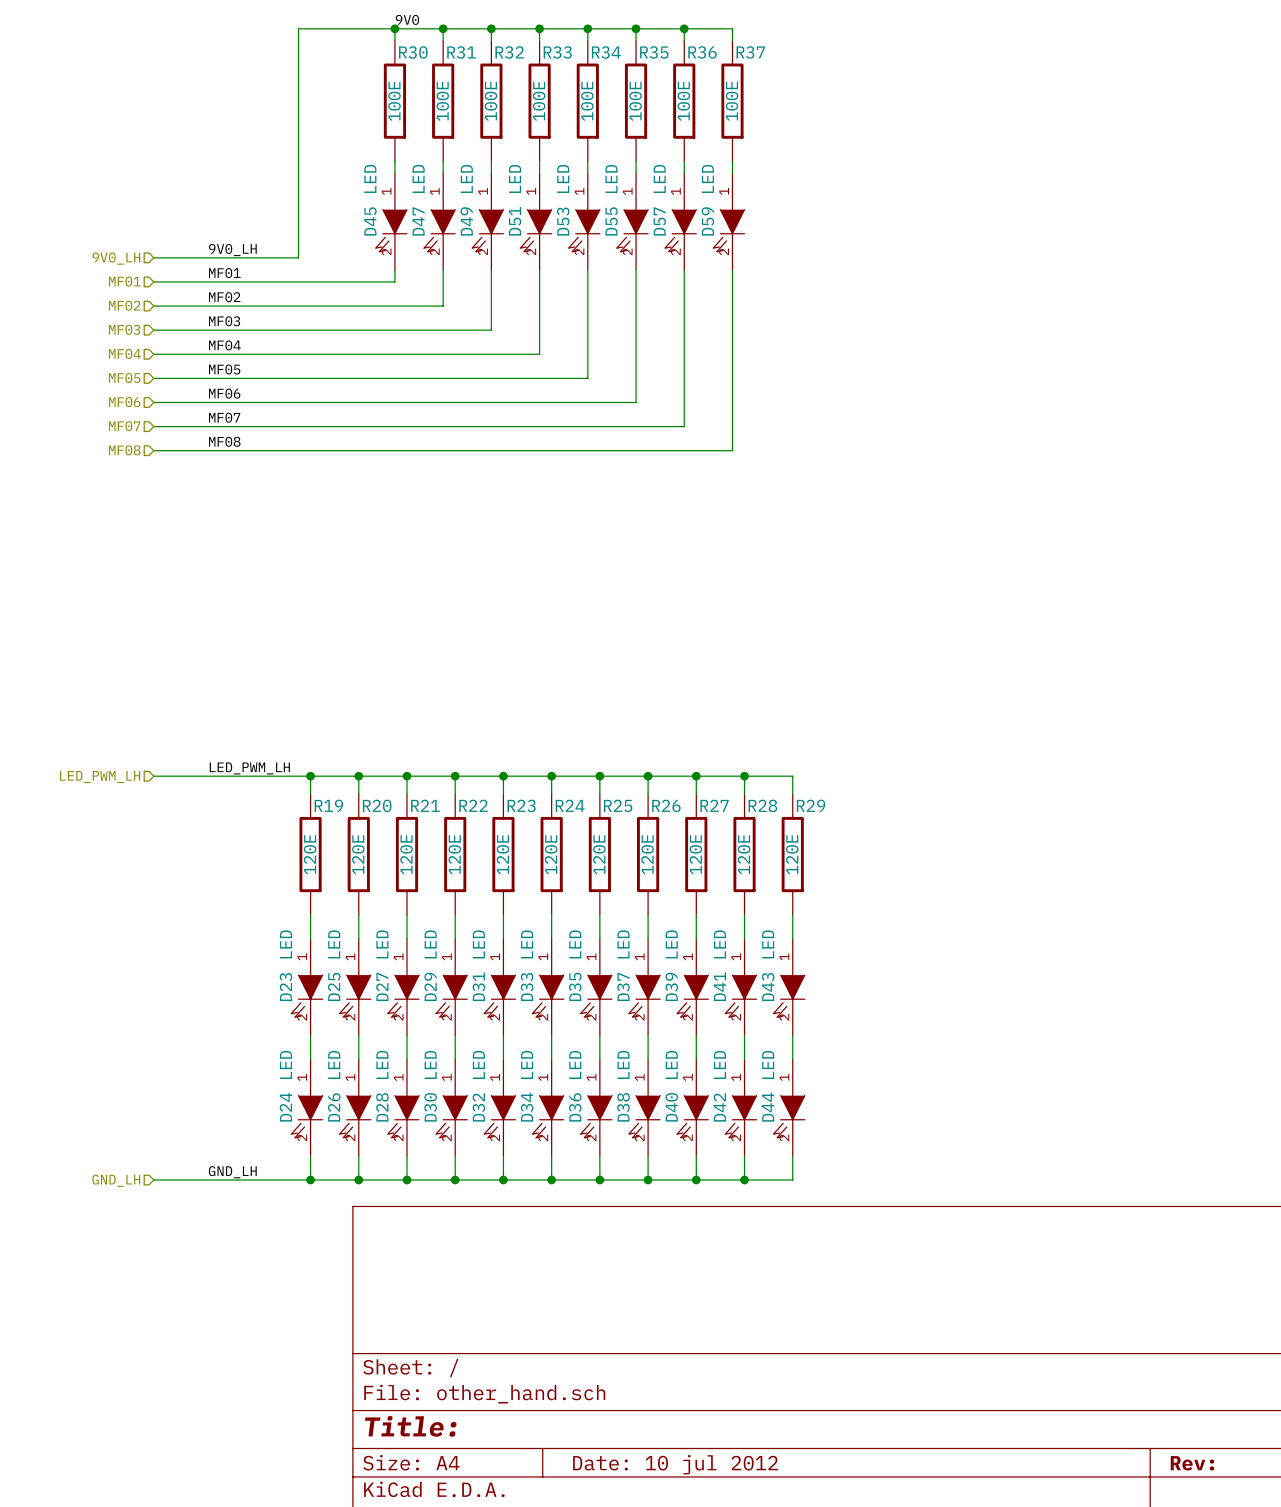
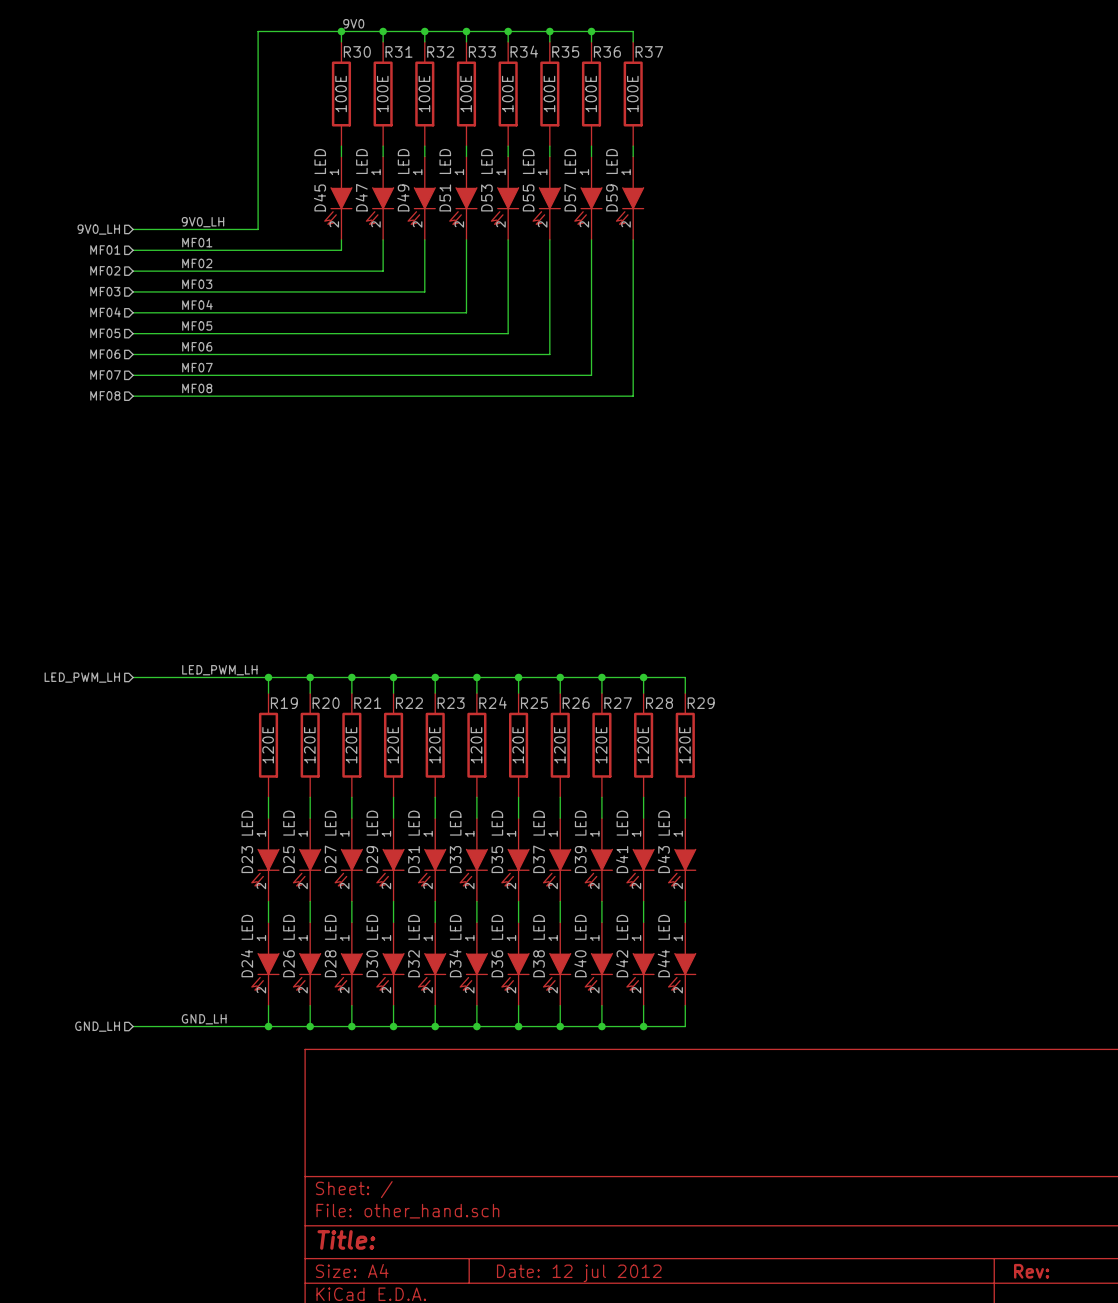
title block: Date: 10 jul 2012 (675, 1464) -> Date: 12 jul 2012 (579, 1273)

